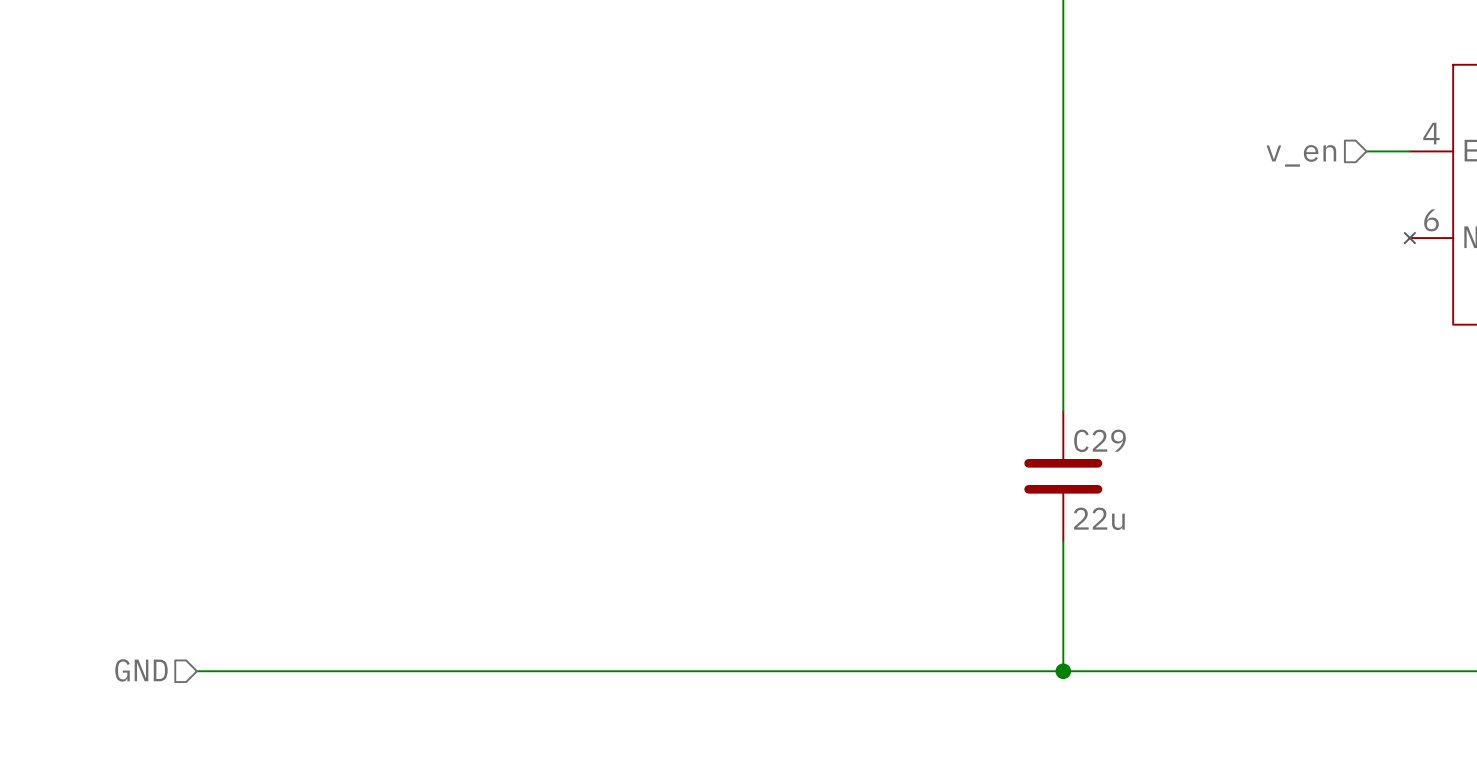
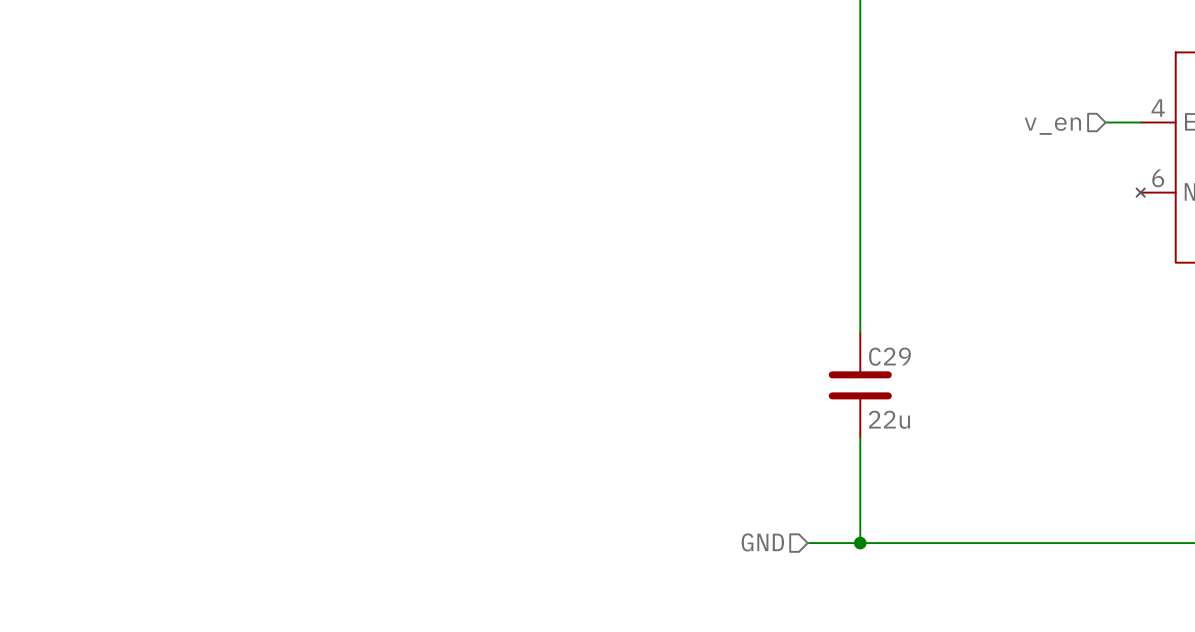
hierarchical label: GND (141, 670) -> none
hierarchical label: none -> GND (762, 542)
wire: (196, 671) (998, 671) -> none

